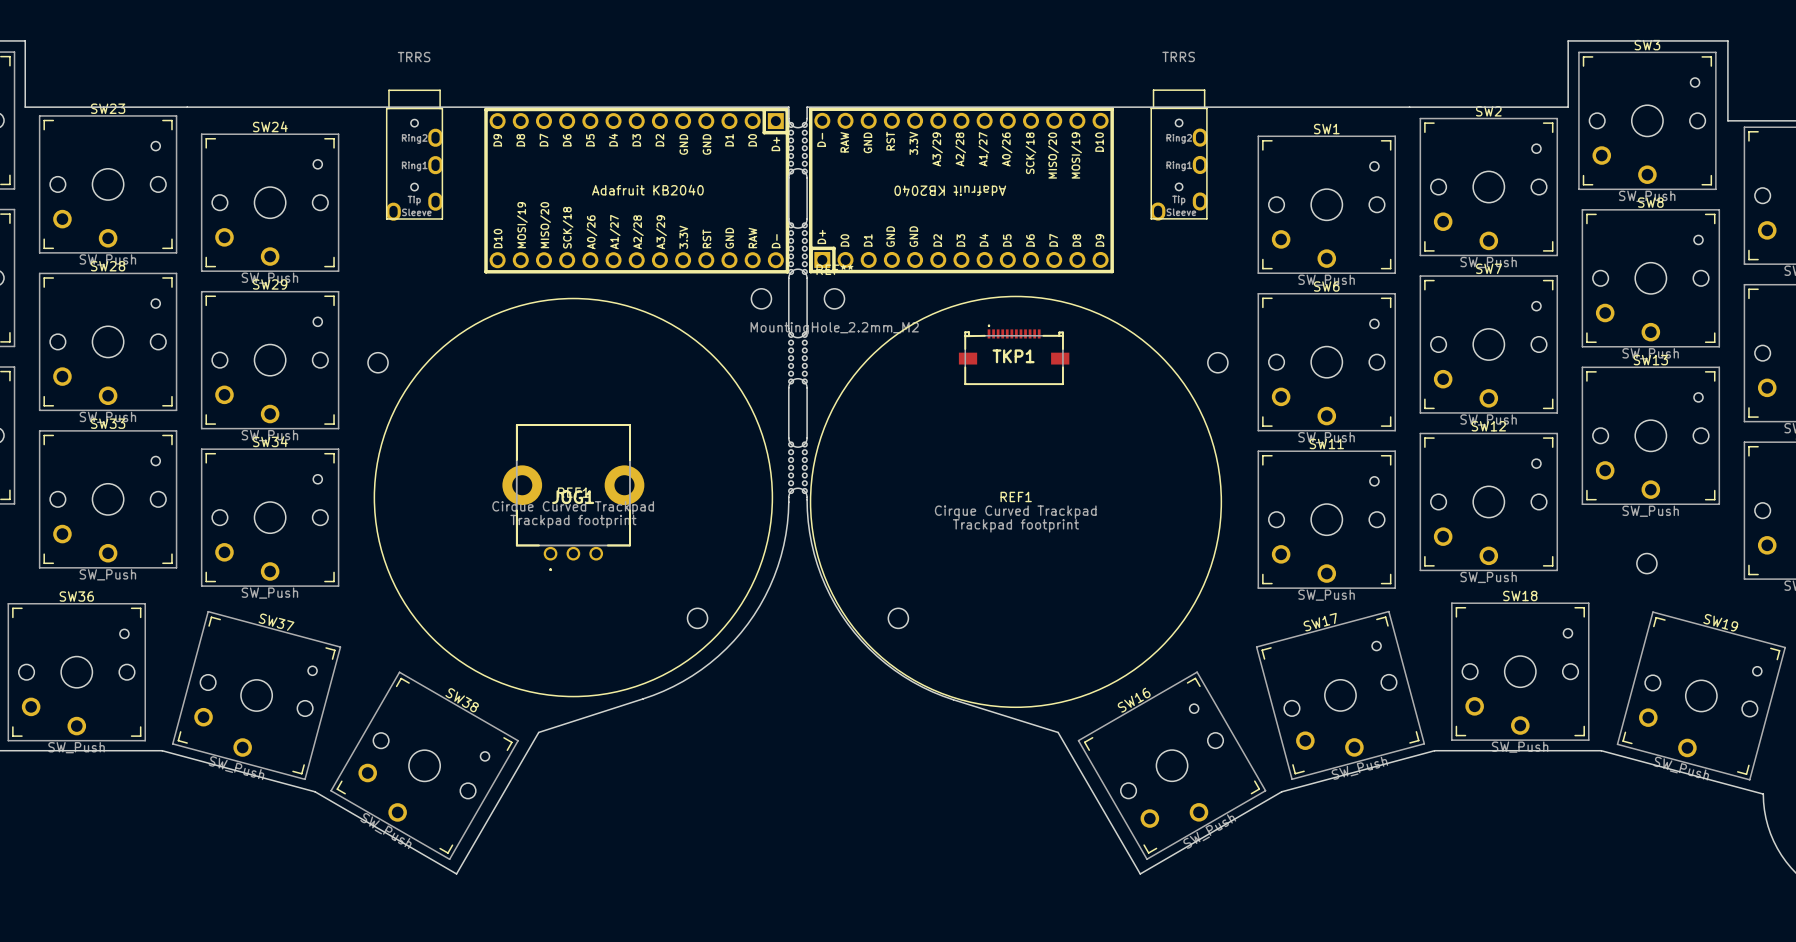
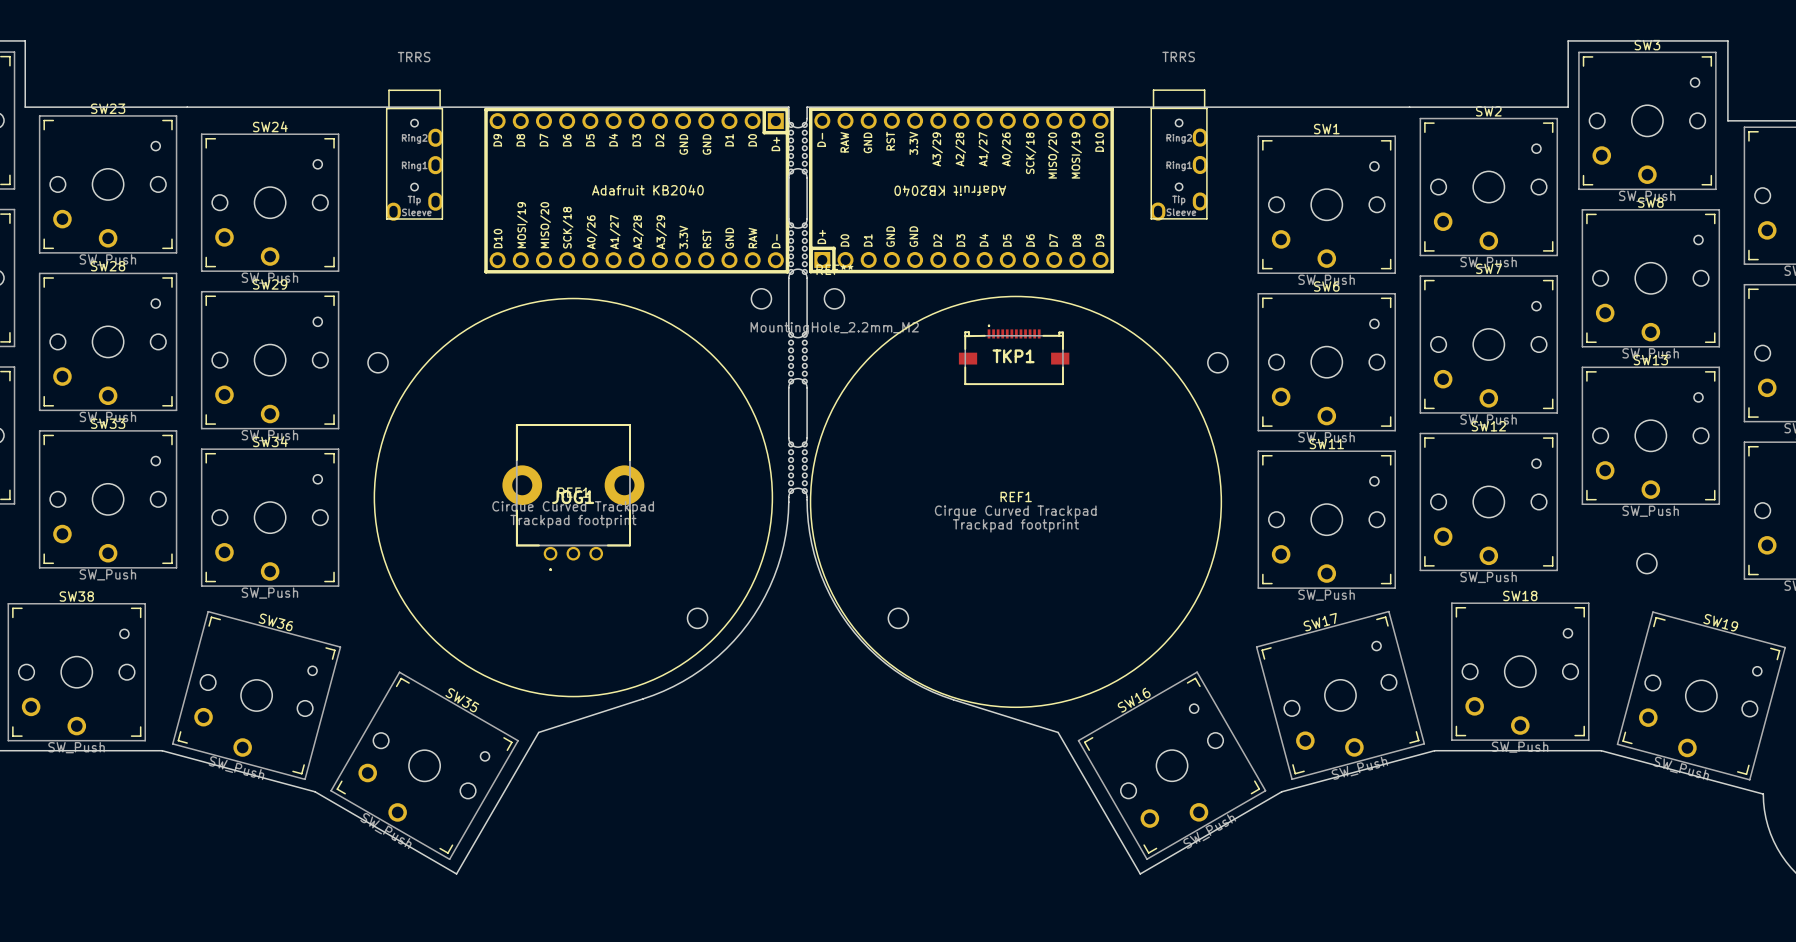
SW36 name: SW36 (76, 596) -> SW38 (76, 596)
SW37 name: SW37 (276, 622) -> SW36 (275, 622)
SW38 name: SW38 (462, 700) -> SW35 (462, 700)

